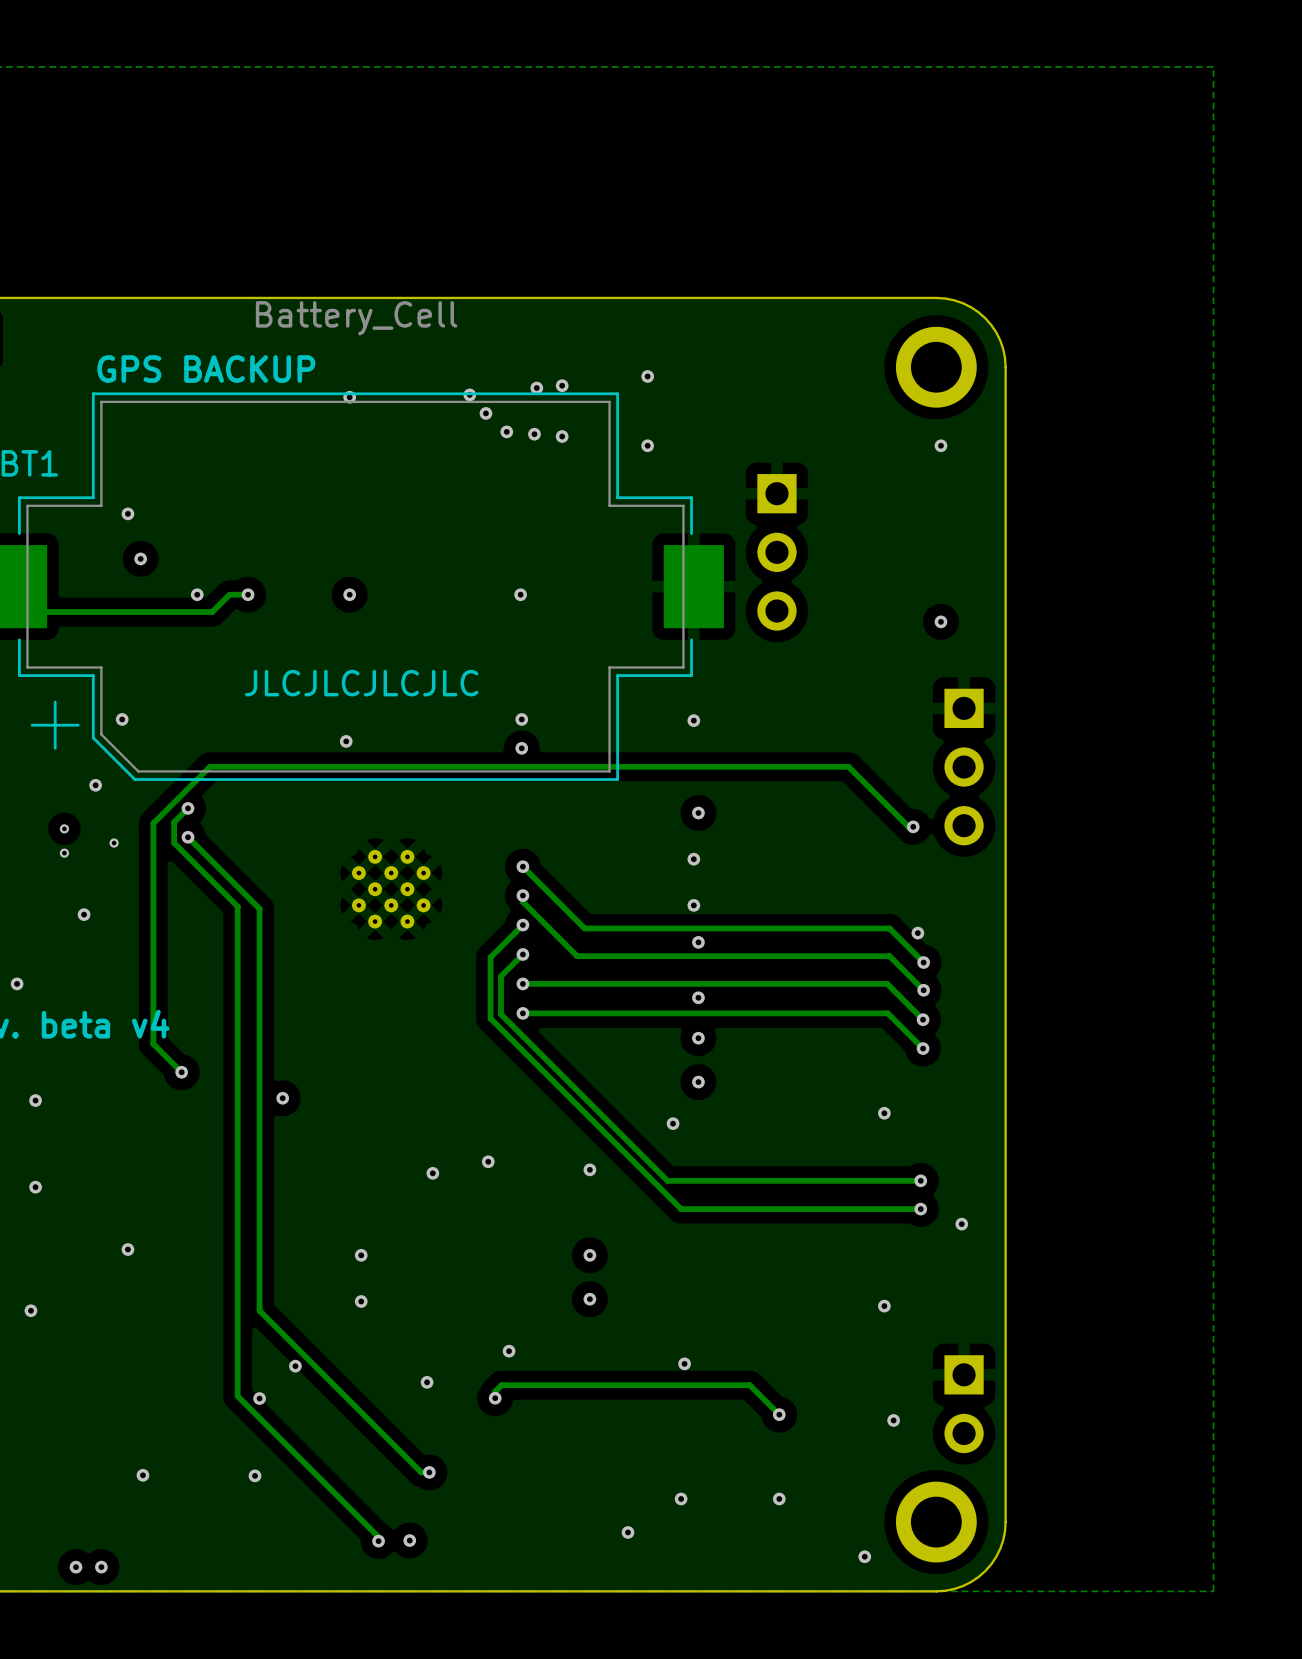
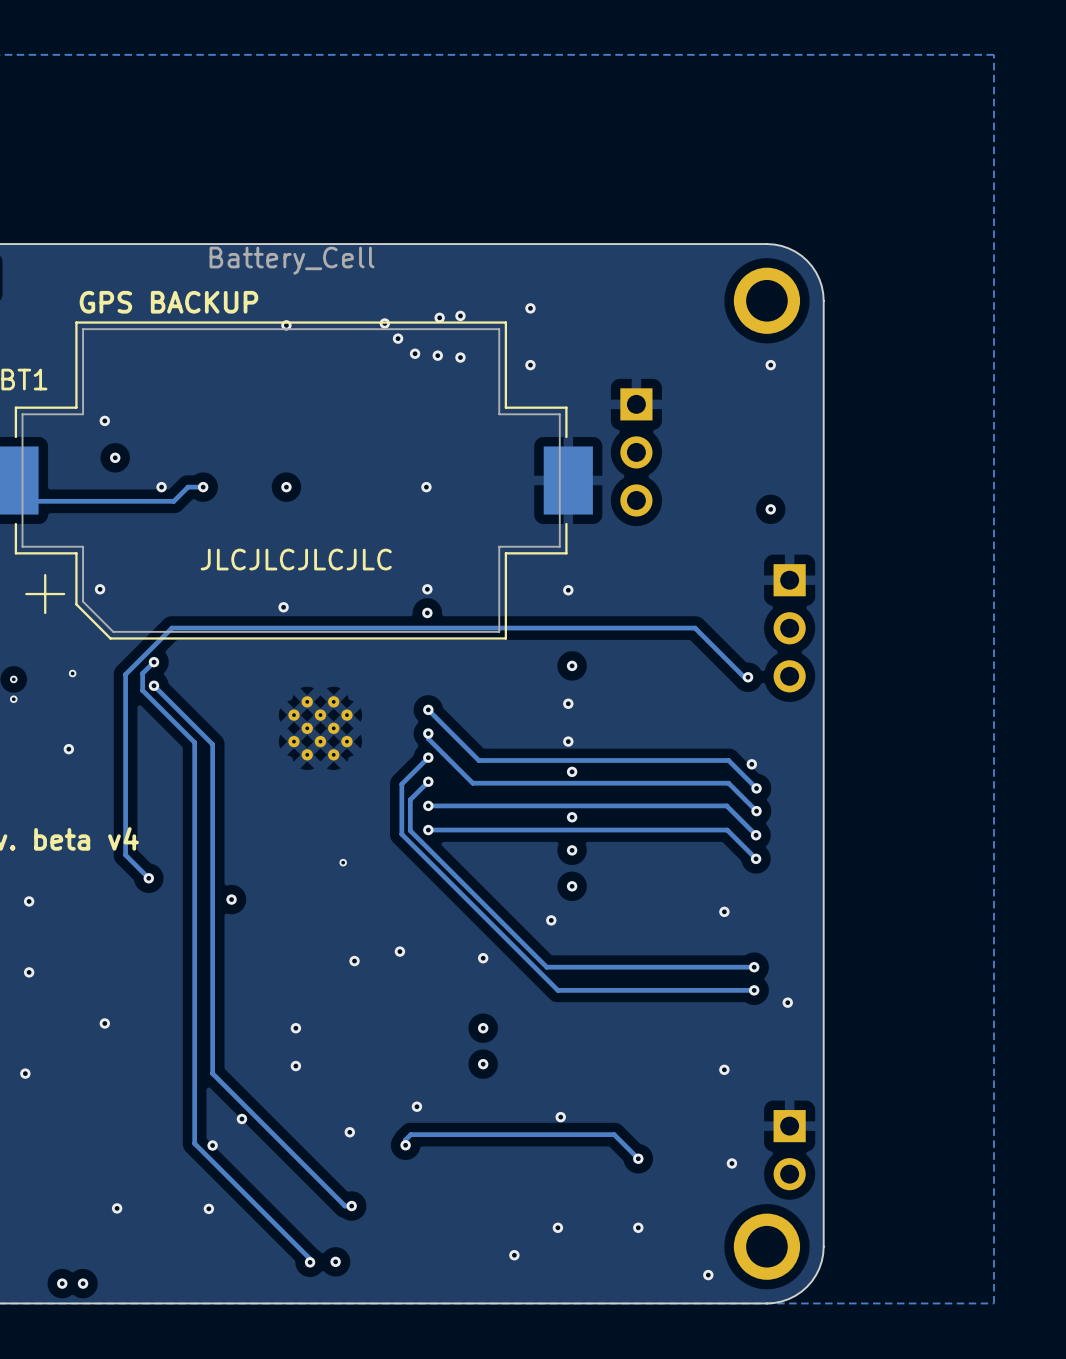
via: (95, 785) -> none
via: none -> (72, 673)
via: (64, 828) -> none
via: none -> (13, 679)
via: (114, 843) -> none
via: none -> (13, 699)
via: (64, 853) -> none
via: (17, 983) -> none
via: none -> (343, 862)

